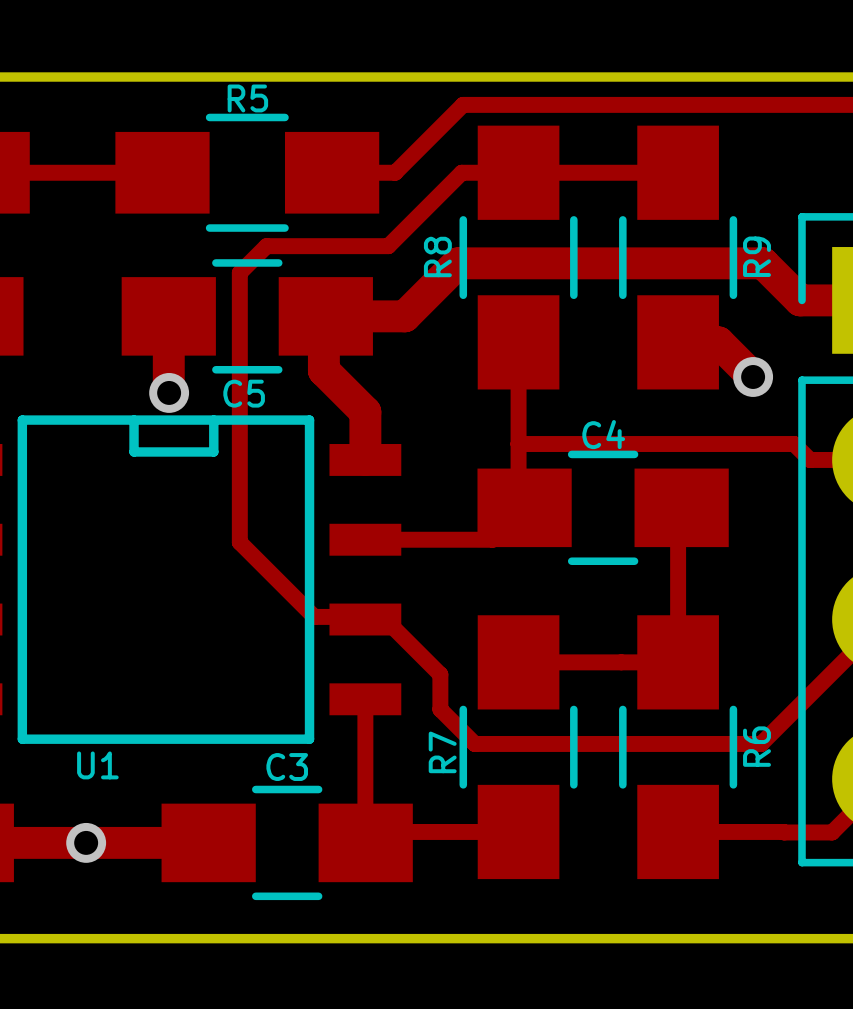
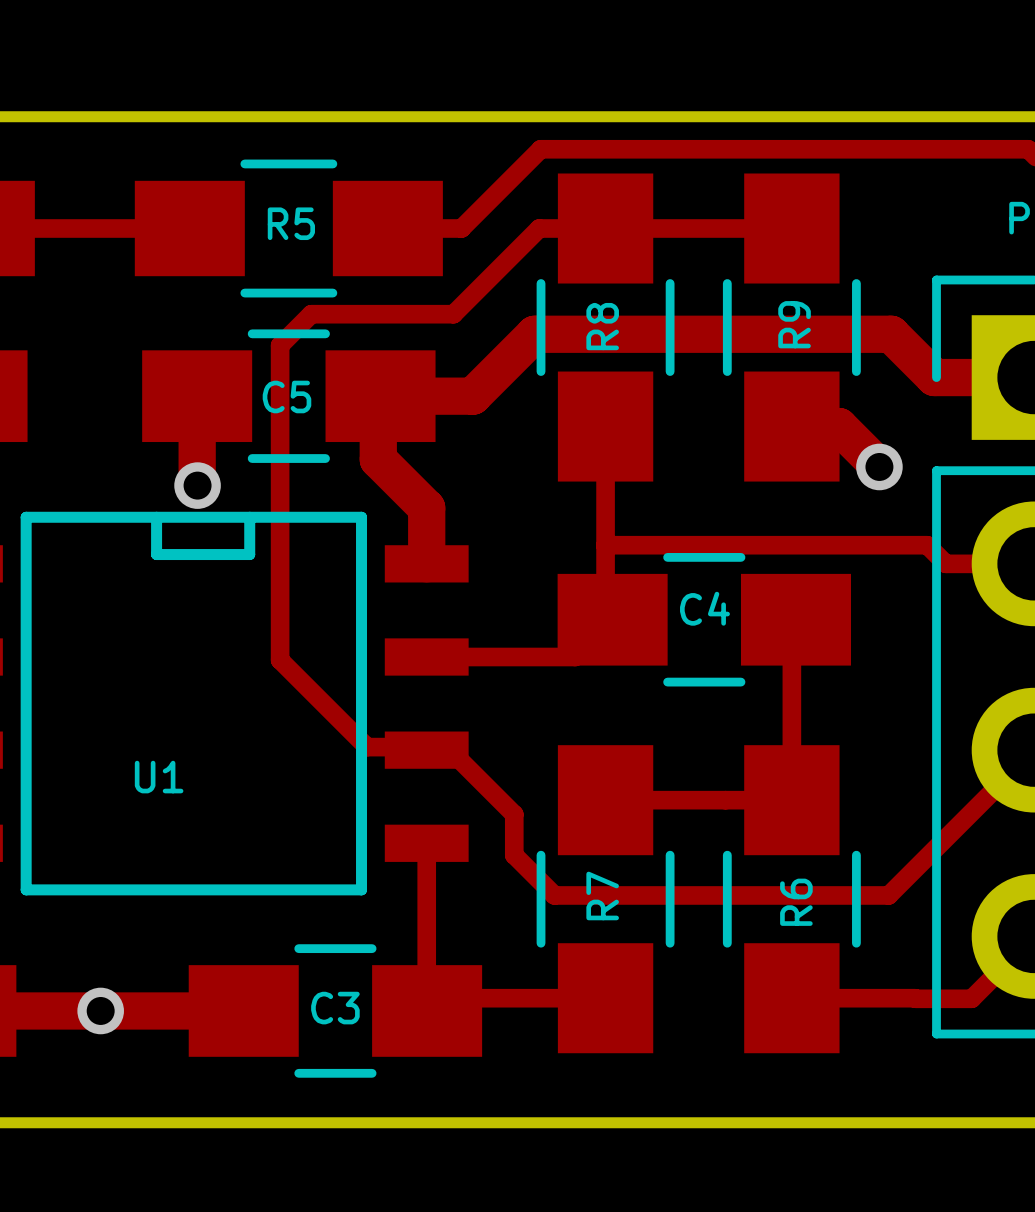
R5 name position: R5 (247, 98) -> R5 (291, 223)
R8 name position: R8 (437, 256) -> R8 (602, 326)
R9 name position: R9 (757, 256) -> R9 (794, 324)
C5 name position: C5 (244, 393) -> C5 (286, 396)
C4 name position: C4 (603, 434) -> C4 (704, 608)
R6 name position: R6 (757, 746) -> R6 (796, 902)
R7 name position: R7 (442, 752) -> R7 (602, 896)
U1 name position: U1 (97, 765) -> U1 (159, 777)
C3 name position: C3 (287, 767) -> C3 (335, 1008)

